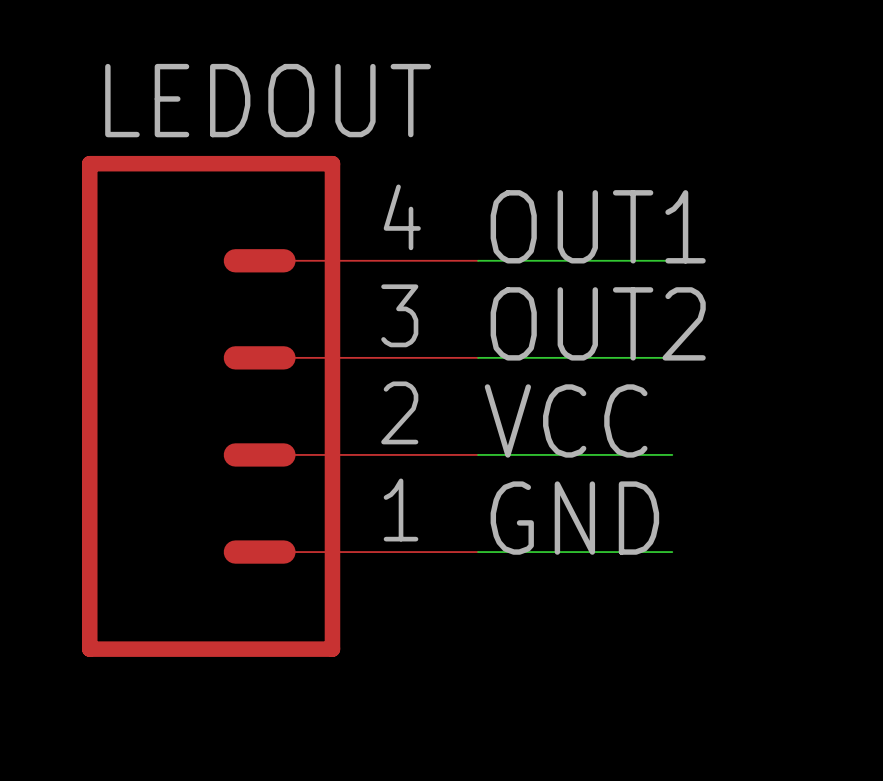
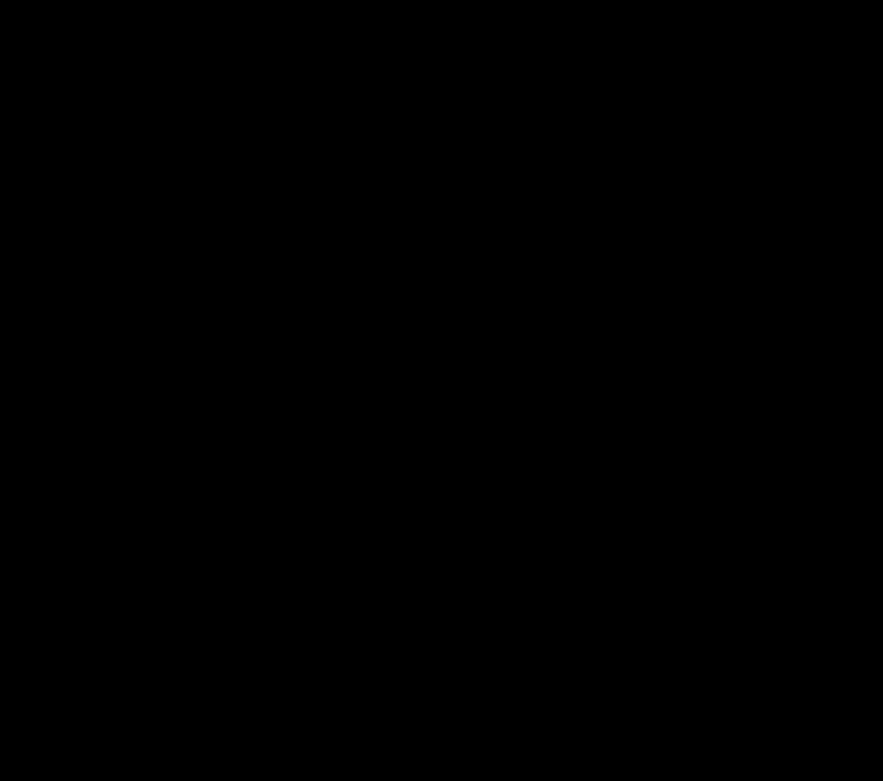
label: OUT1 (598, 226) -> none
wire: (478, 260) (672, 260) -> none
label: OUT2 (598, 323) -> none
wire: (478, 357) (672, 357) -> none
LEDOUT: (280, 406) -> none
label: VCC (566, 420) -> none
wire: (478, 454) (672, 454) -> none
label: GND (574, 518) -> none
wire: (478, 552) (672, 552) -> none

